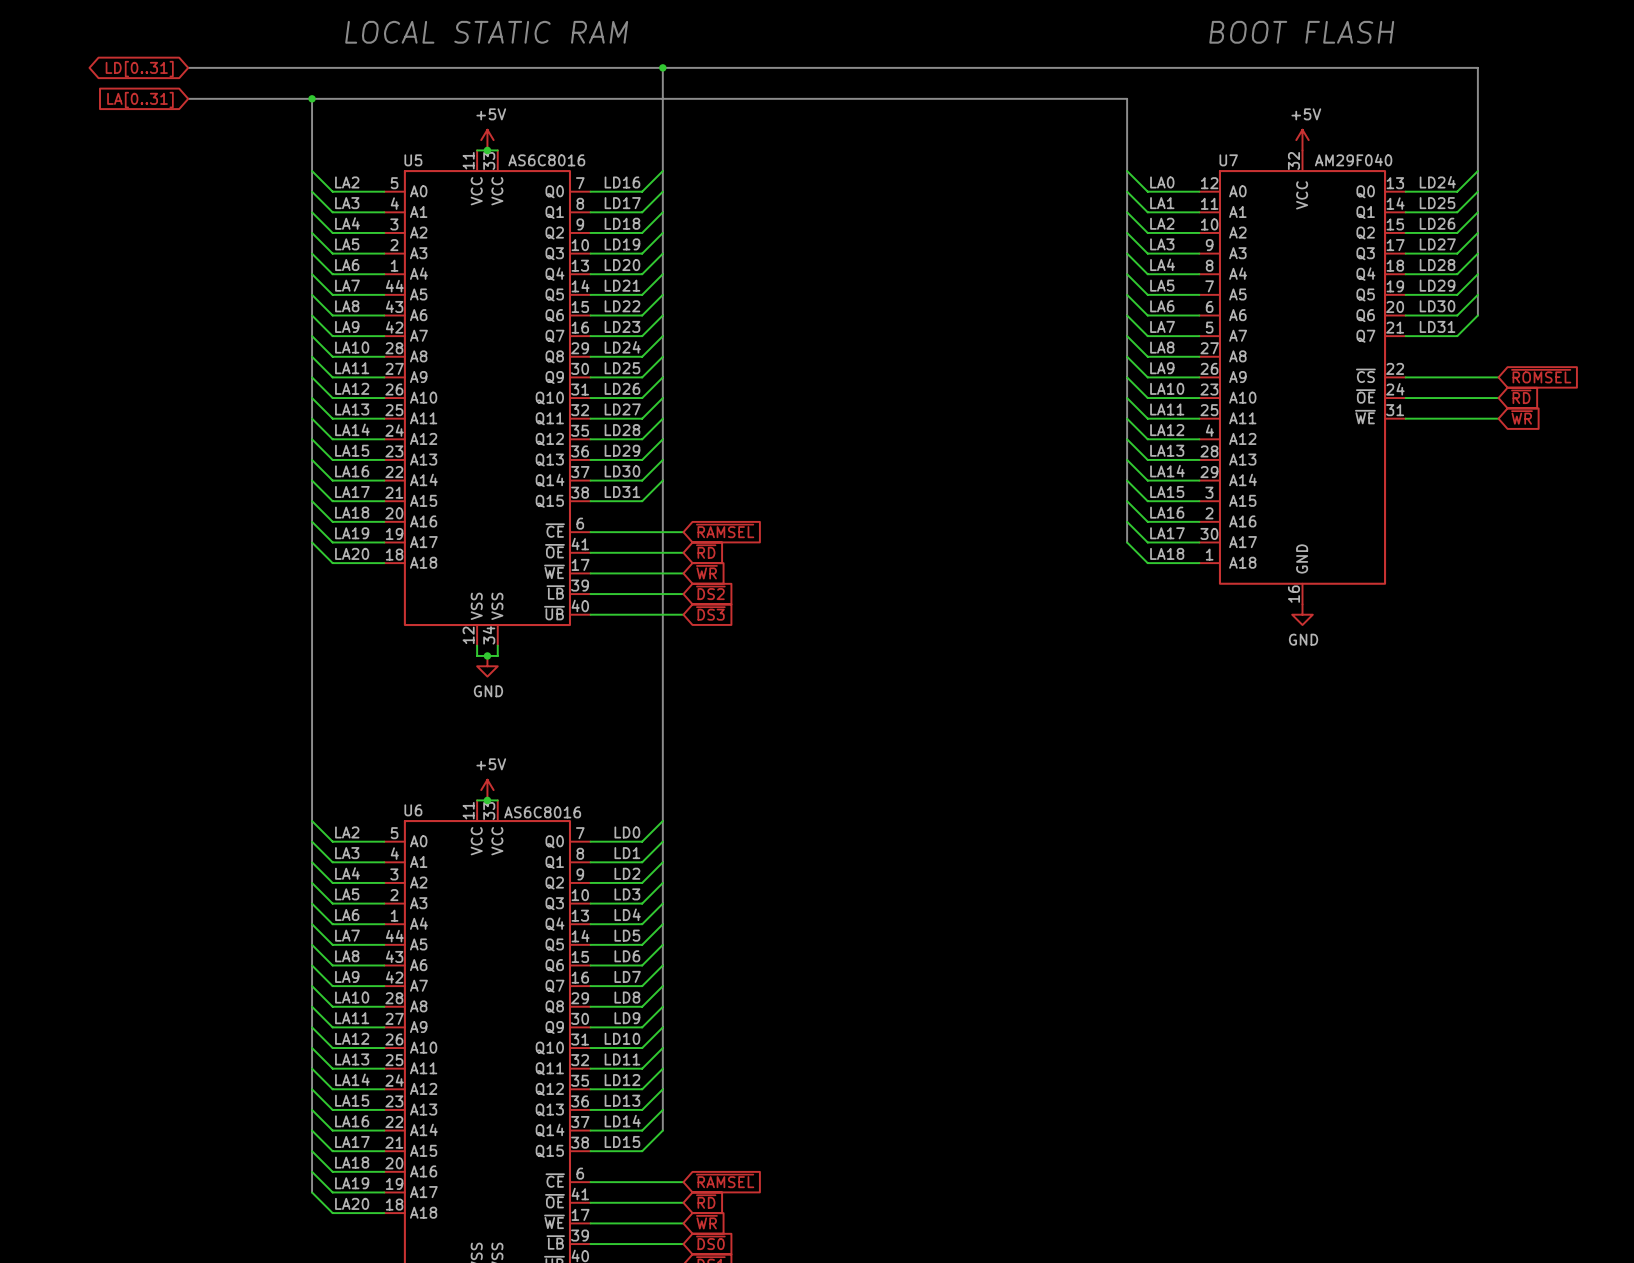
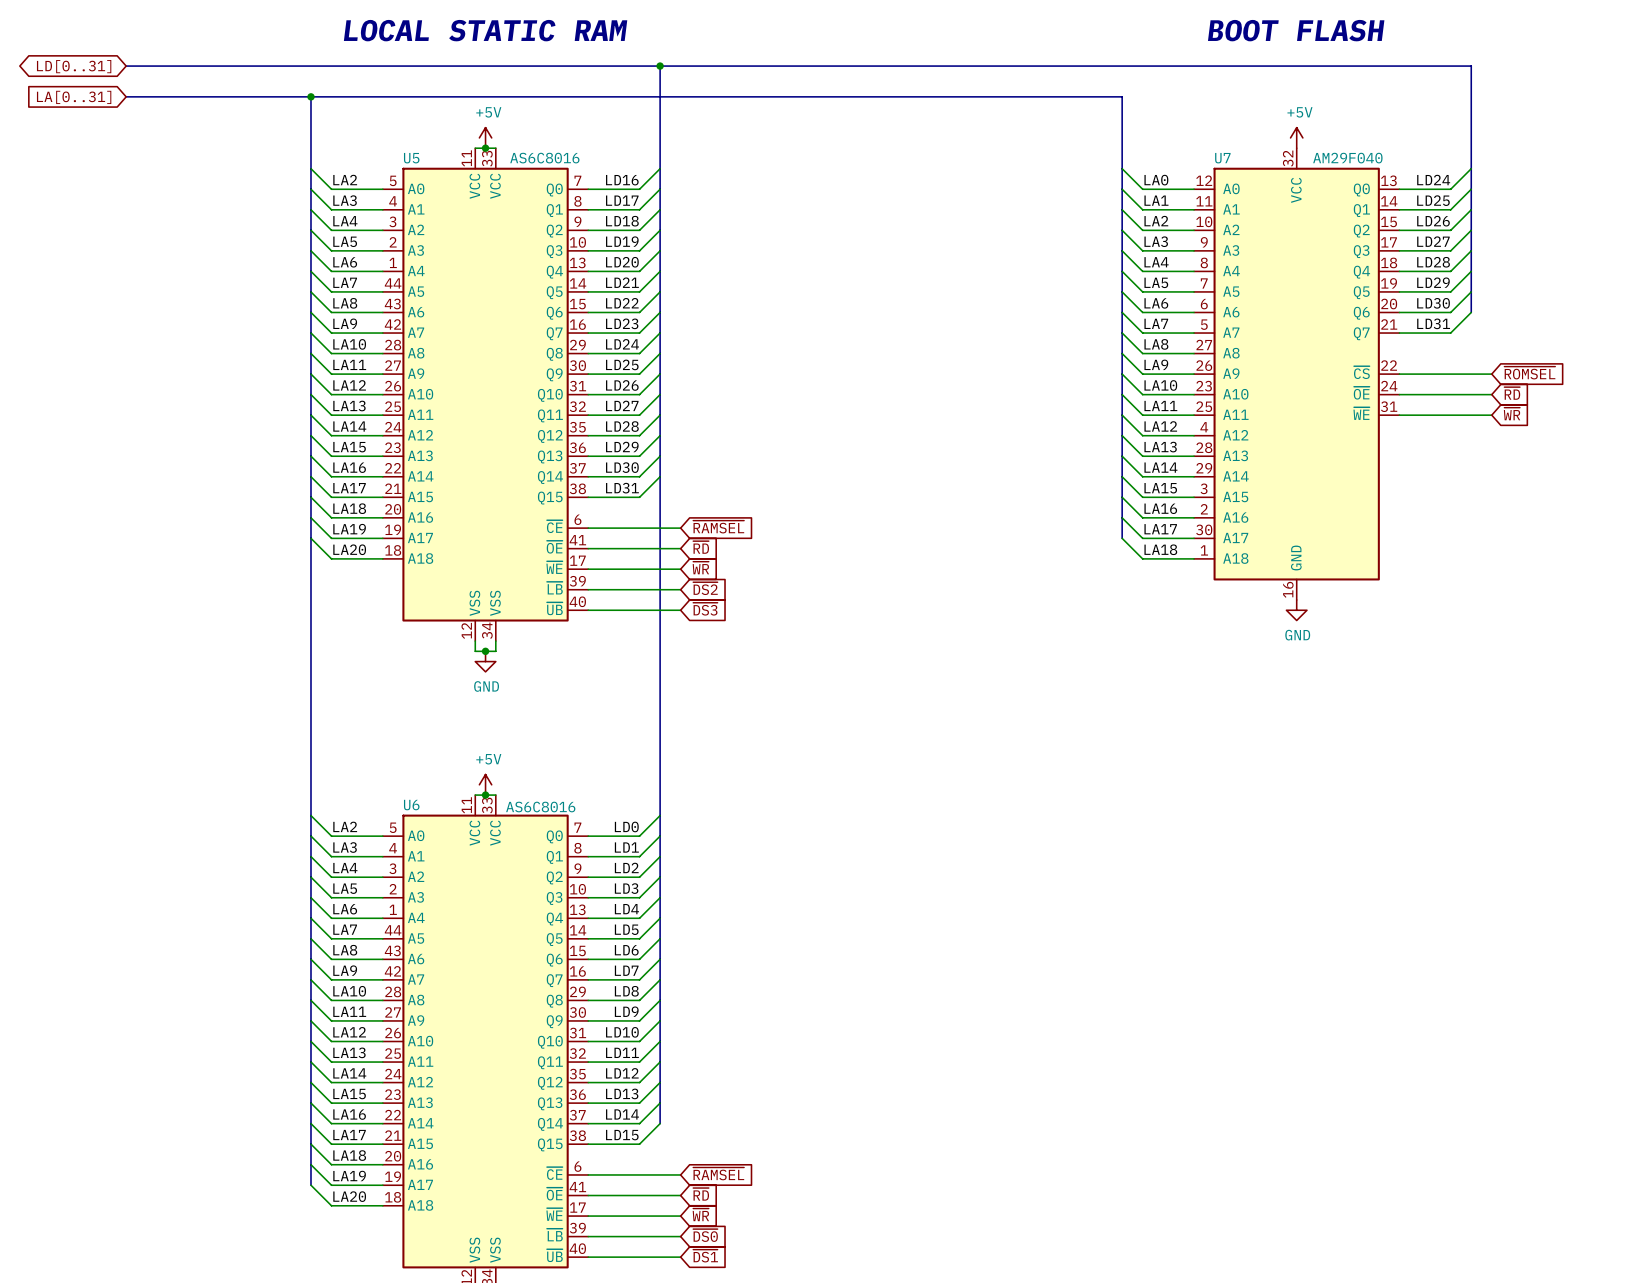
bus: none -> (126, 66) (187, 66)
global label position: LD[0..31] (139, 69) -> LD[0..31] (74, 66)
bus: none -> (126, 96) (187, 96)
global label position: LA[0..31] (140, 100) -> LA[0..31] (74, 97)

